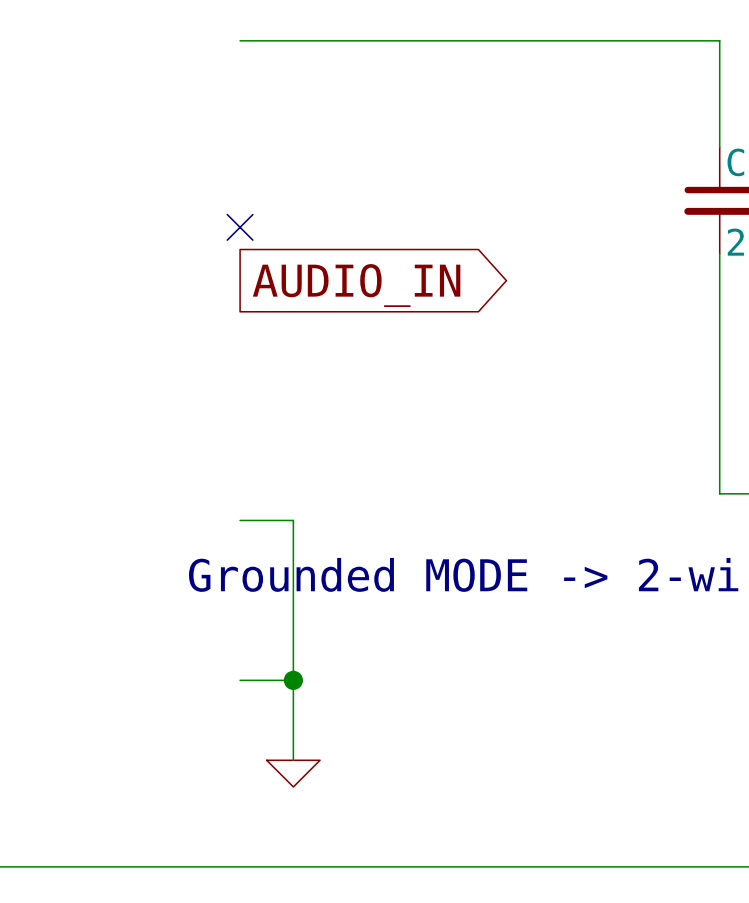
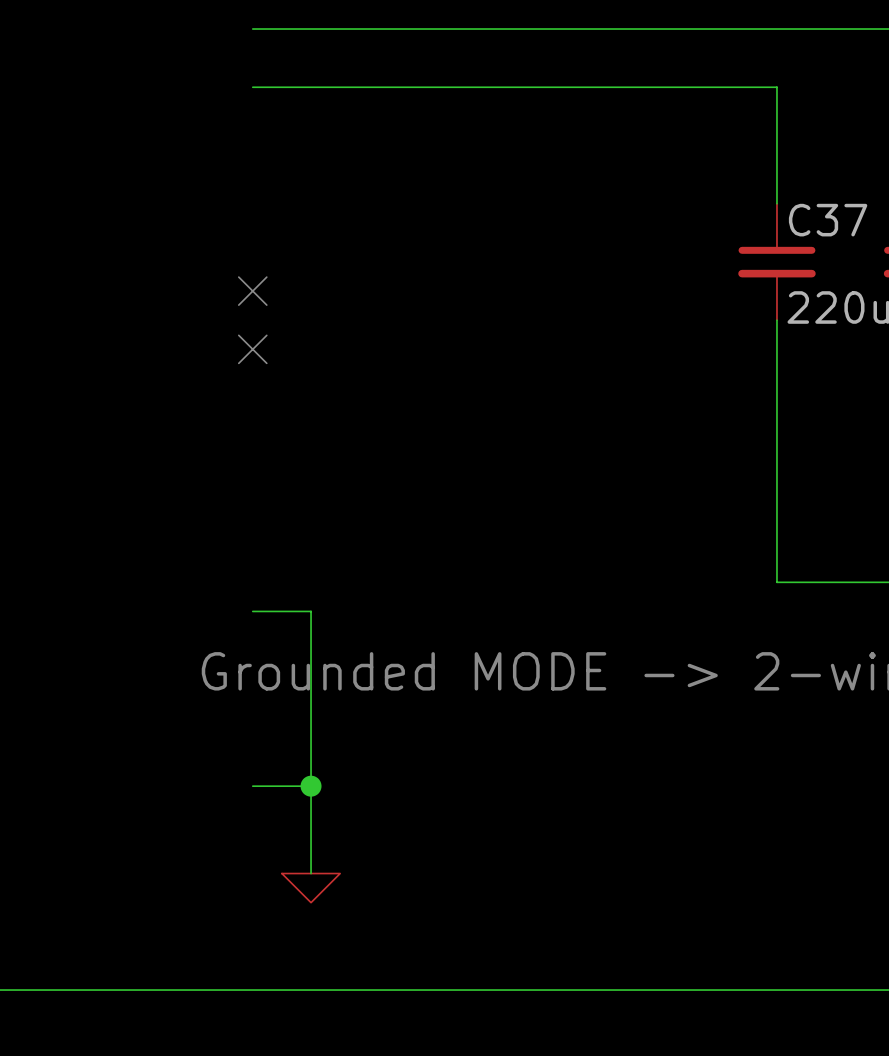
no-connect mark: none -> (252, 349)
global label: AUDIO_IN (356, 285) -> none

